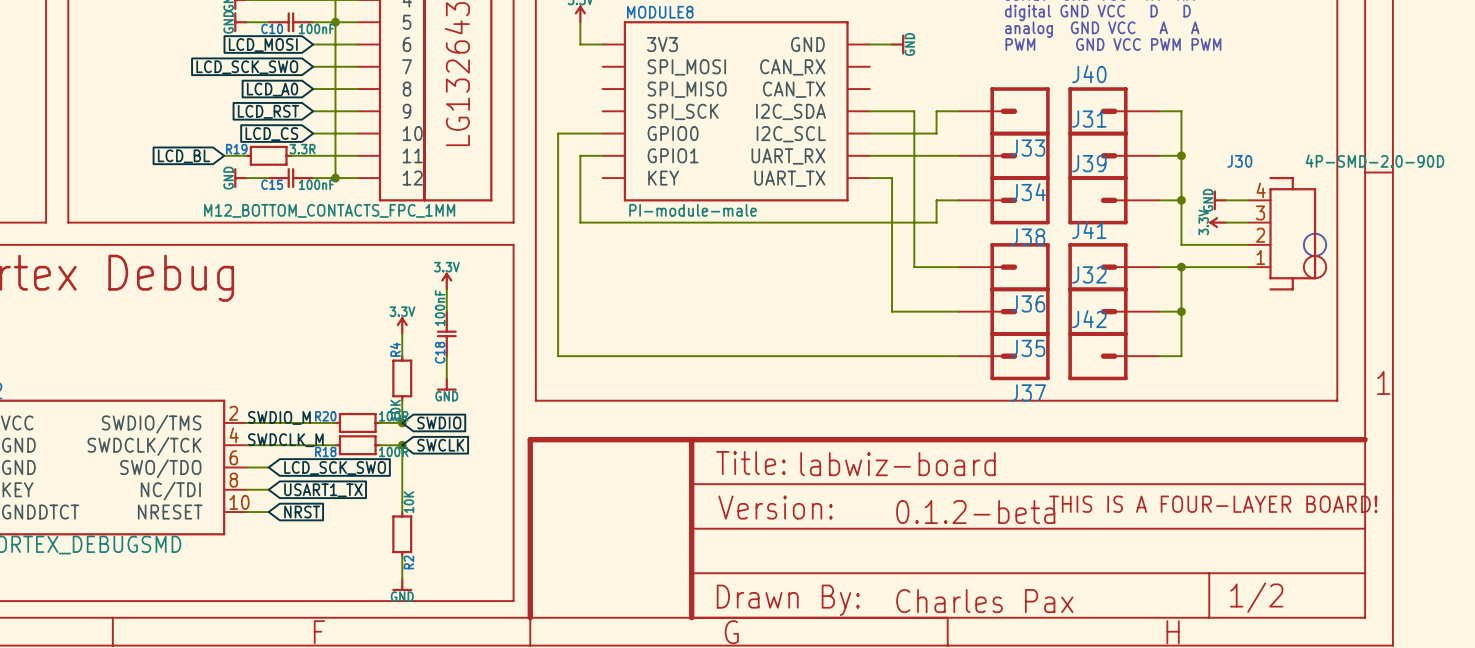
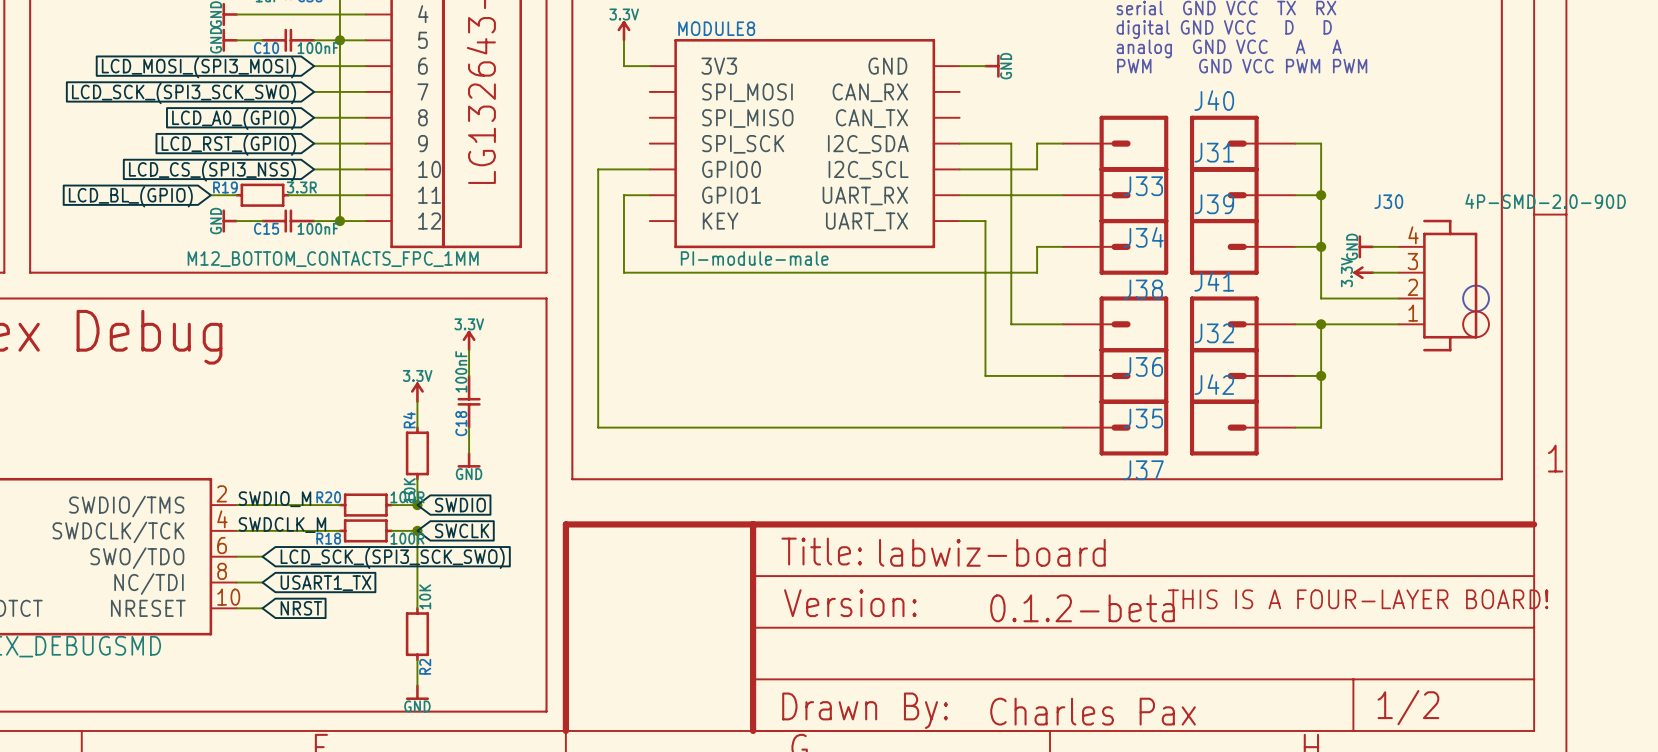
global label: LCD_MOSI (263, 45) -> LCD_MOSI_(SPI3_MOSI) (198, 67)
global label: LCD_SCK_SWO (247, 67) -> LCD_SCK_(SPI3_SCK_SWO) (184, 93)
global label: LCD_A0 (272, 89) -> LCD_A0_(GPIO) (234, 119)
global label: LCD_RST (268, 111) -> LCD_RST_(GPIO) (228, 145)
global label: LCD_CS (271, 134) -> LCD_CS_(SPI3_NSS) (212, 170)
global label: LCD_BL (183, 156) -> LCD_BL_(GPIO) (130, 196)
global label: LCD_SCK_SWO (335, 468) -> LCD_SCK_(SPI3_SCK_SWO) (392, 558)

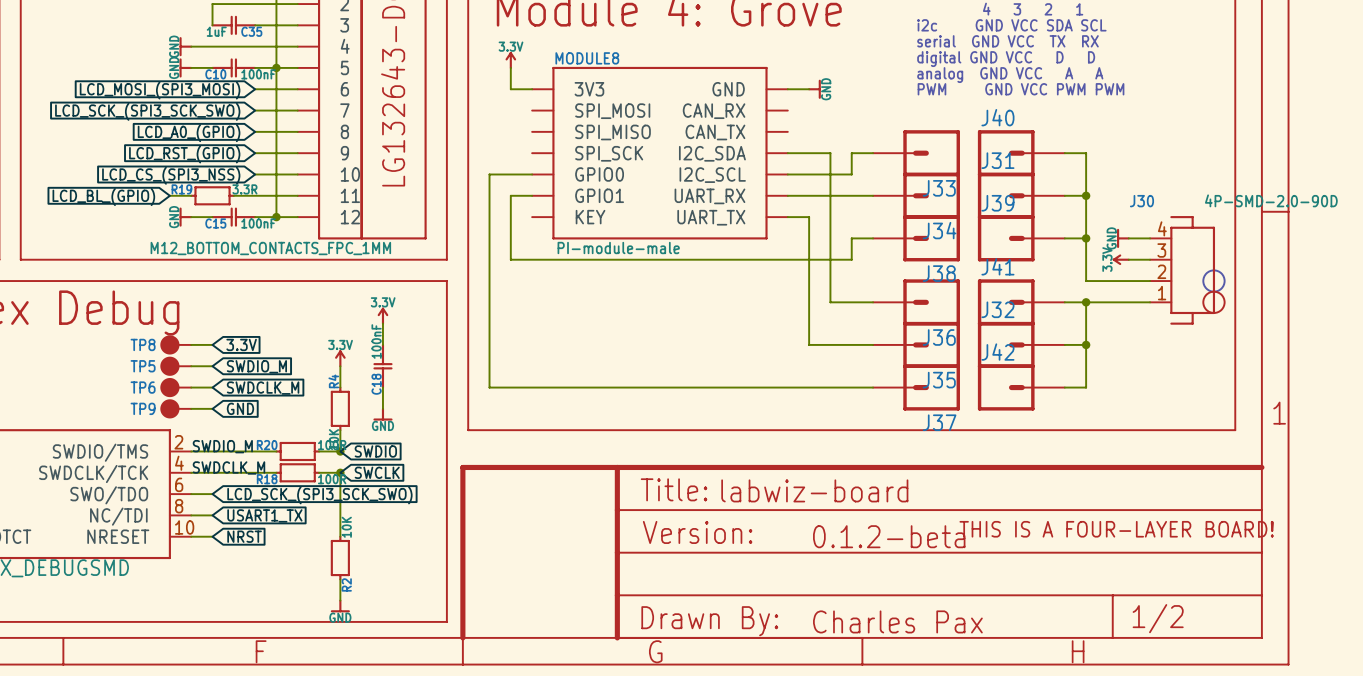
TP8: none -> (175, 344)
wire: none -> (191, 344) (212, 344)
global label: none -> 3.3V (241, 344)
TP5: none -> (175, 366)
wire: none -> (191, 366) (212, 366)
global label: none -> SWDIO_M (256, 366)
TP6: none -> (175, 387)
wire: none -> (191, 387) (212, 387)
global label: none -> SWDCLK_M (263, 388)
TP9: none -> (175, 408)
wire: none -> (191, 408) (212, 408)
global label: none -> GND (240, 408)

